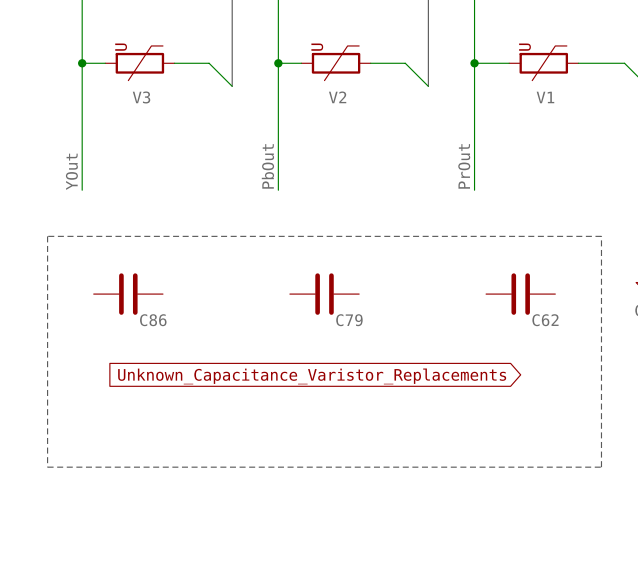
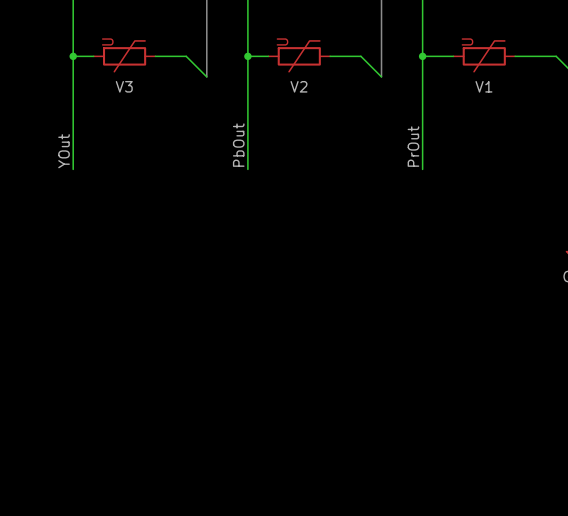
line: (47, 236) (601, 236) (601, 467) (47, 467) (47, 236) -> none
C86: (128, 294) -> none
C79: (324, 294) -> none
C62: (520, 294) -> none
global label: Unknown_Capacitance_Varistor_Replacements (312, 376) -> none

